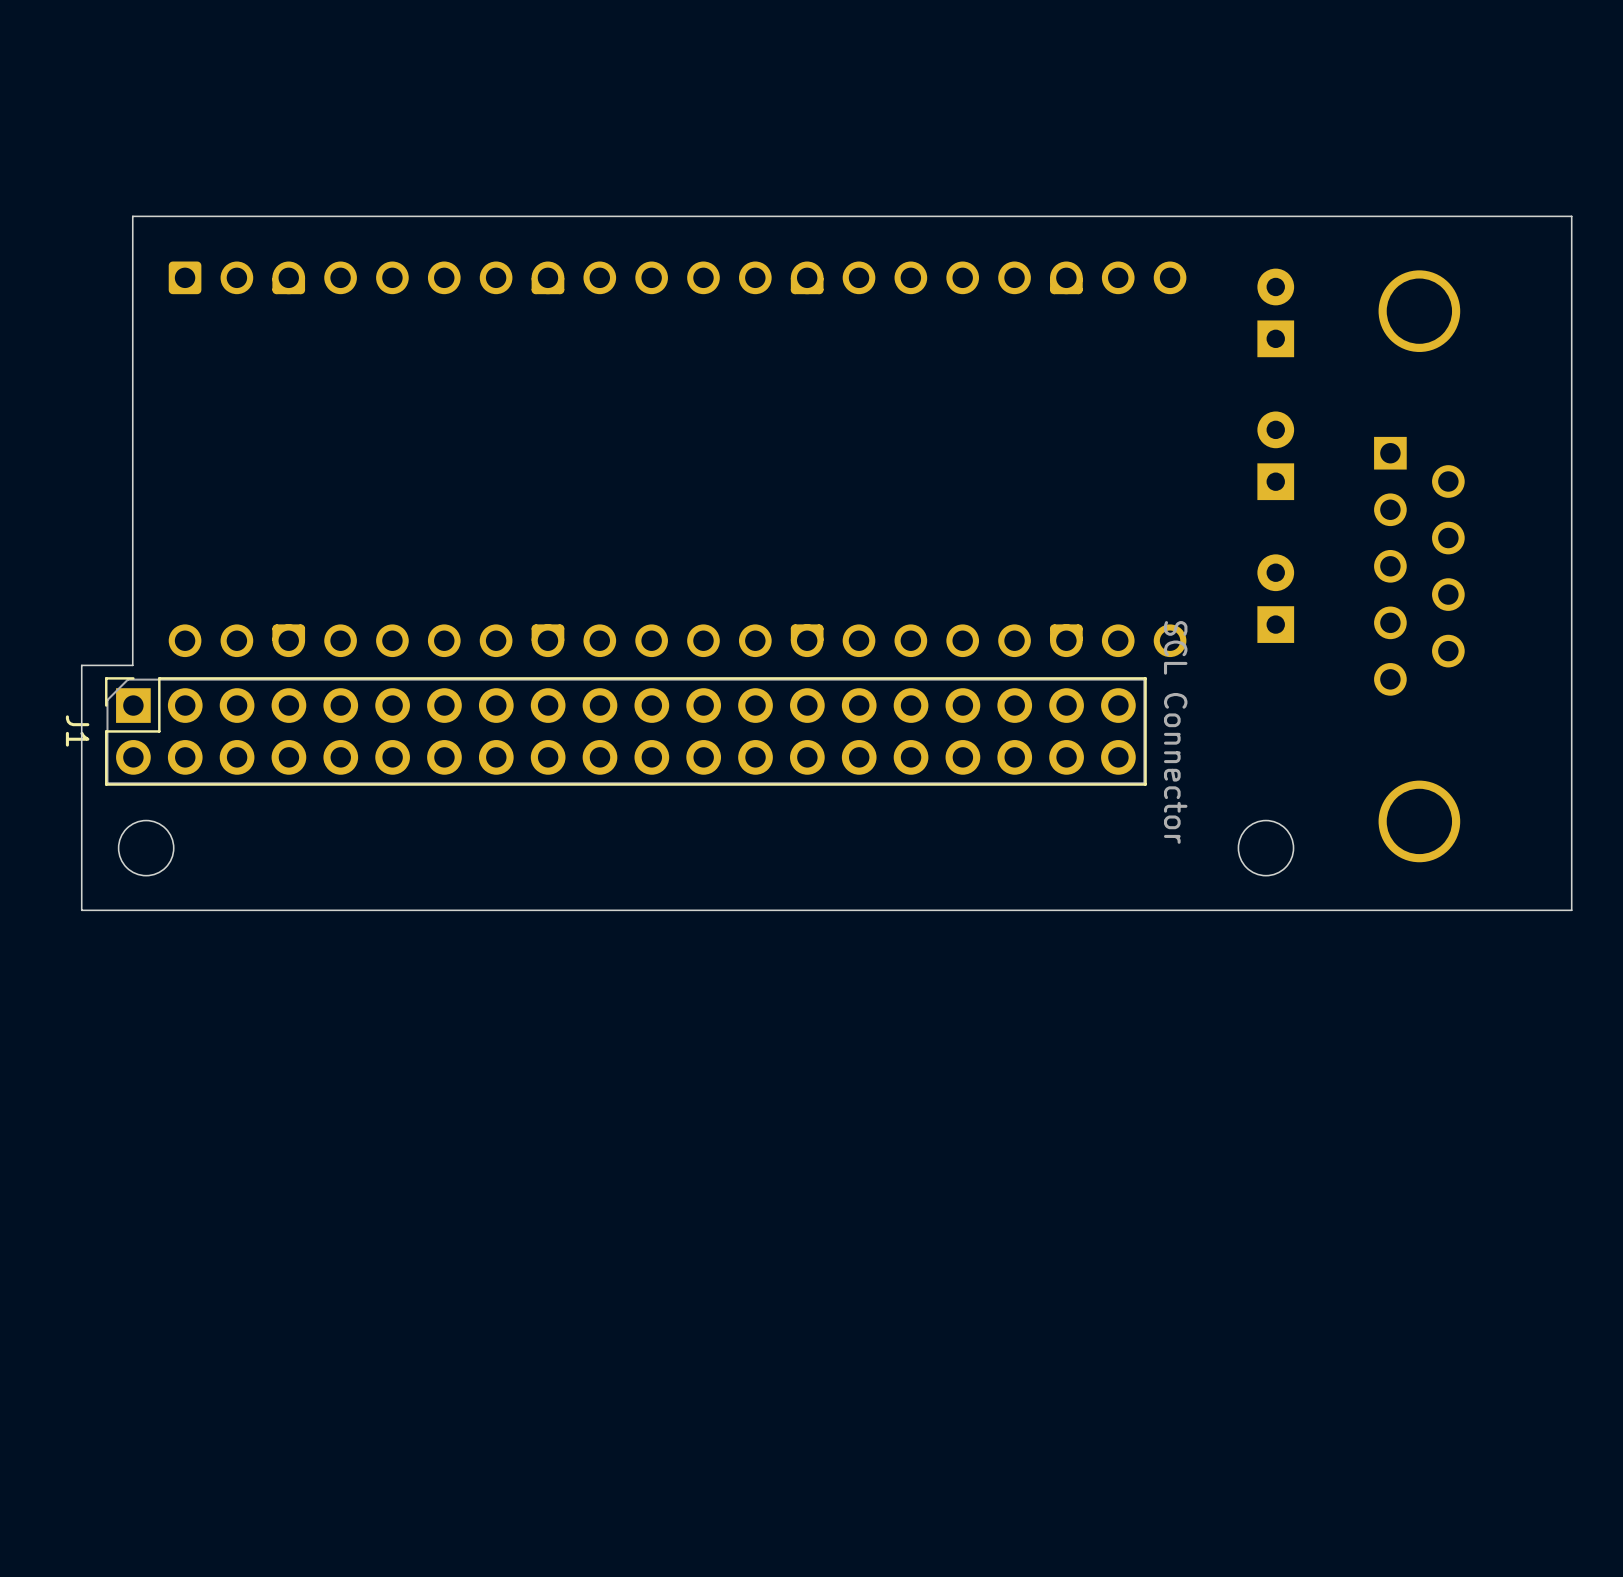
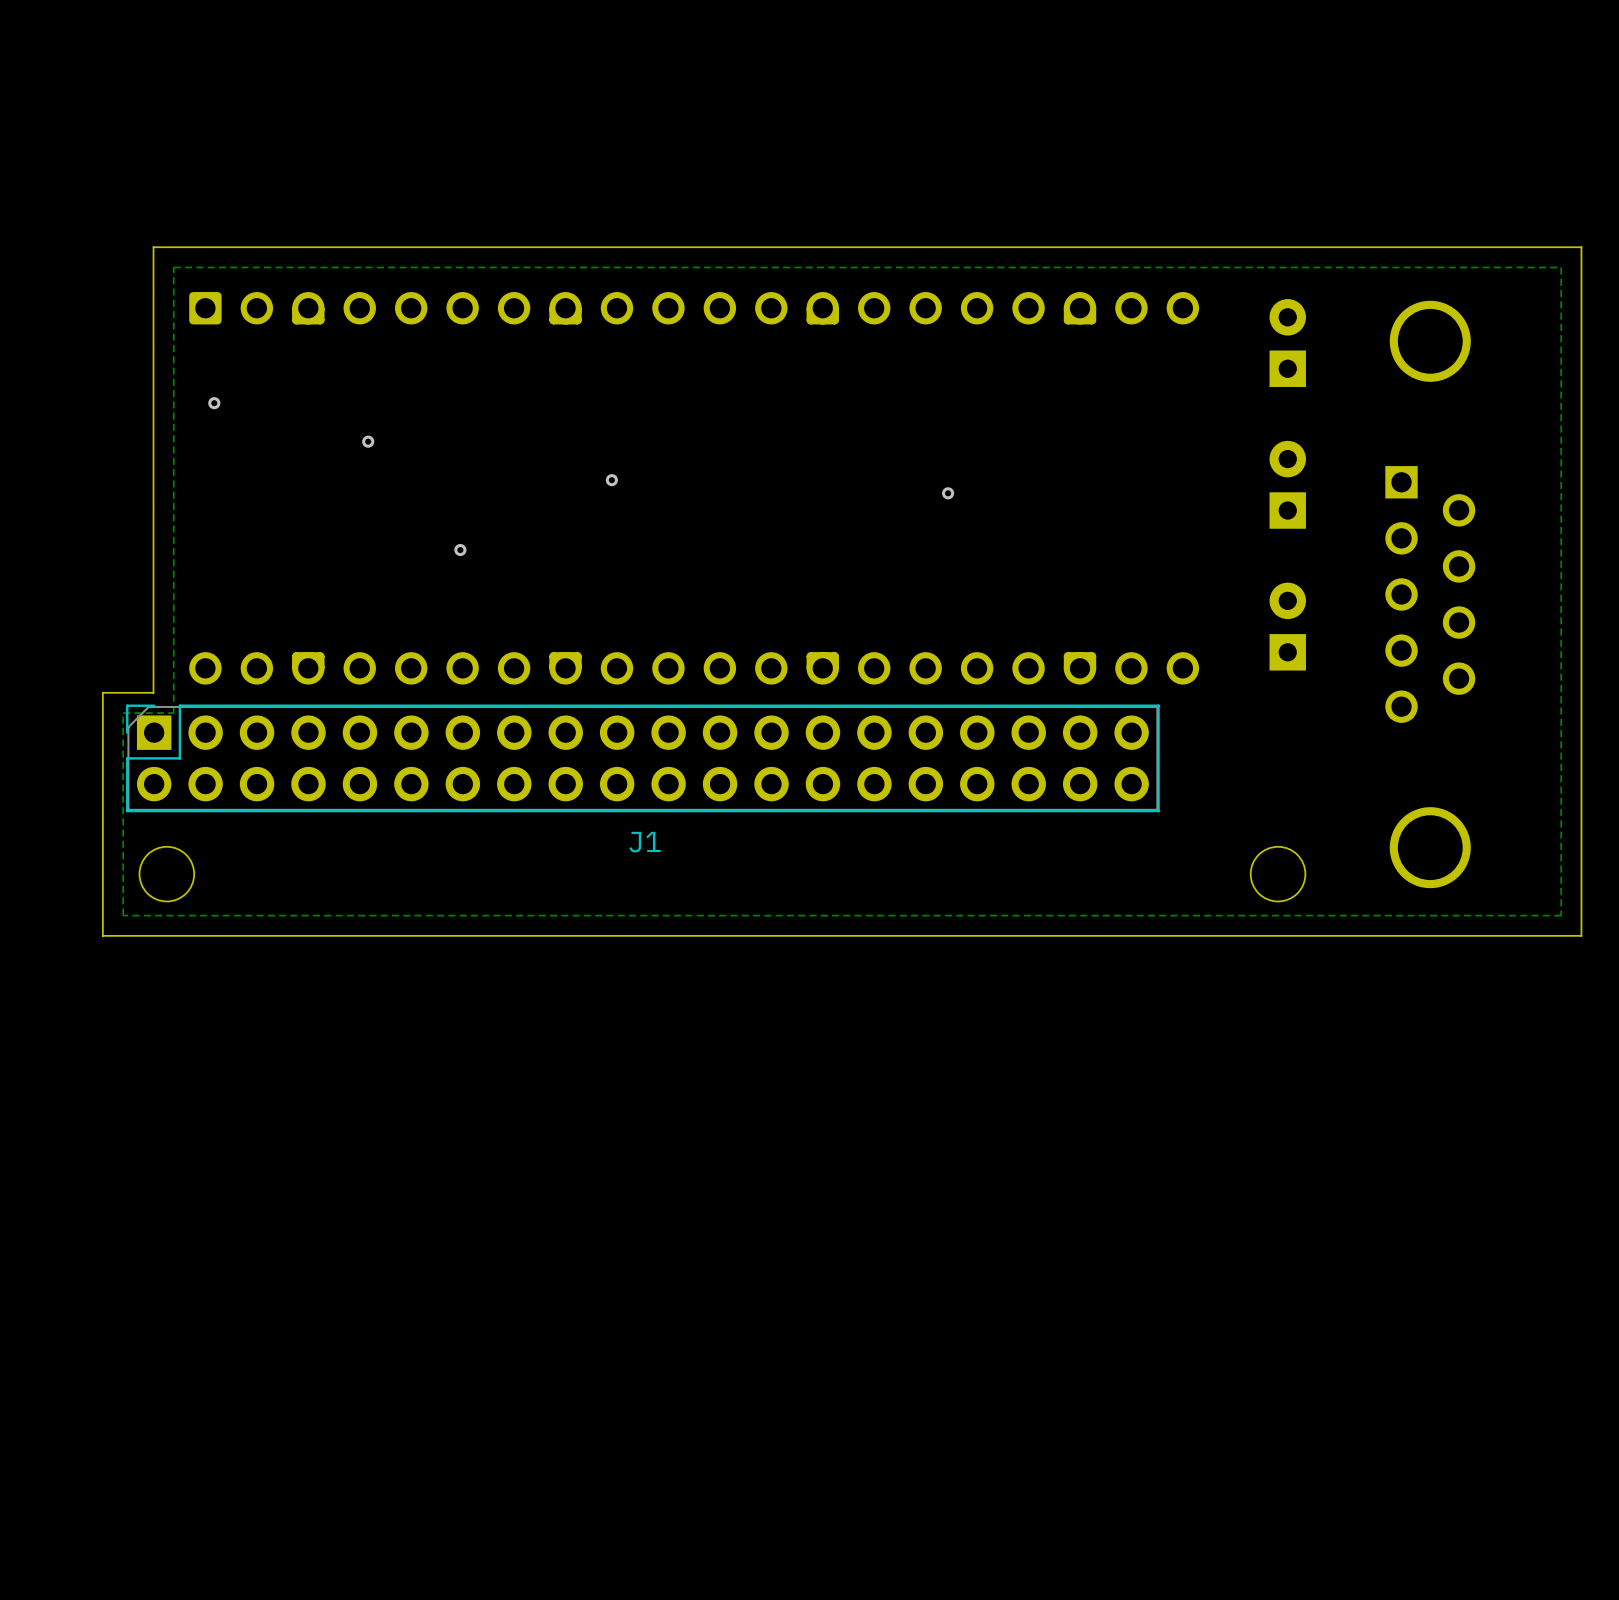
zone outline: none -> (1561, 267) (1561, 915) (123, 915) (123, 713) (173, 713) (173, 267) (1561, 267)
via: none -> (214, 403)
via: none -> (368, 441)
via: none -> (611, 480)
via: none -> (948, 493)
via: none -> (460, 550)
J1 name rotation: 0° (77, 730) -> 90° counterclockwise (645, 842)
J1 name position: J1 (77, 730) -> J1 (645, 842)
J1 value: SCL Connector (1175, 732) -> none

